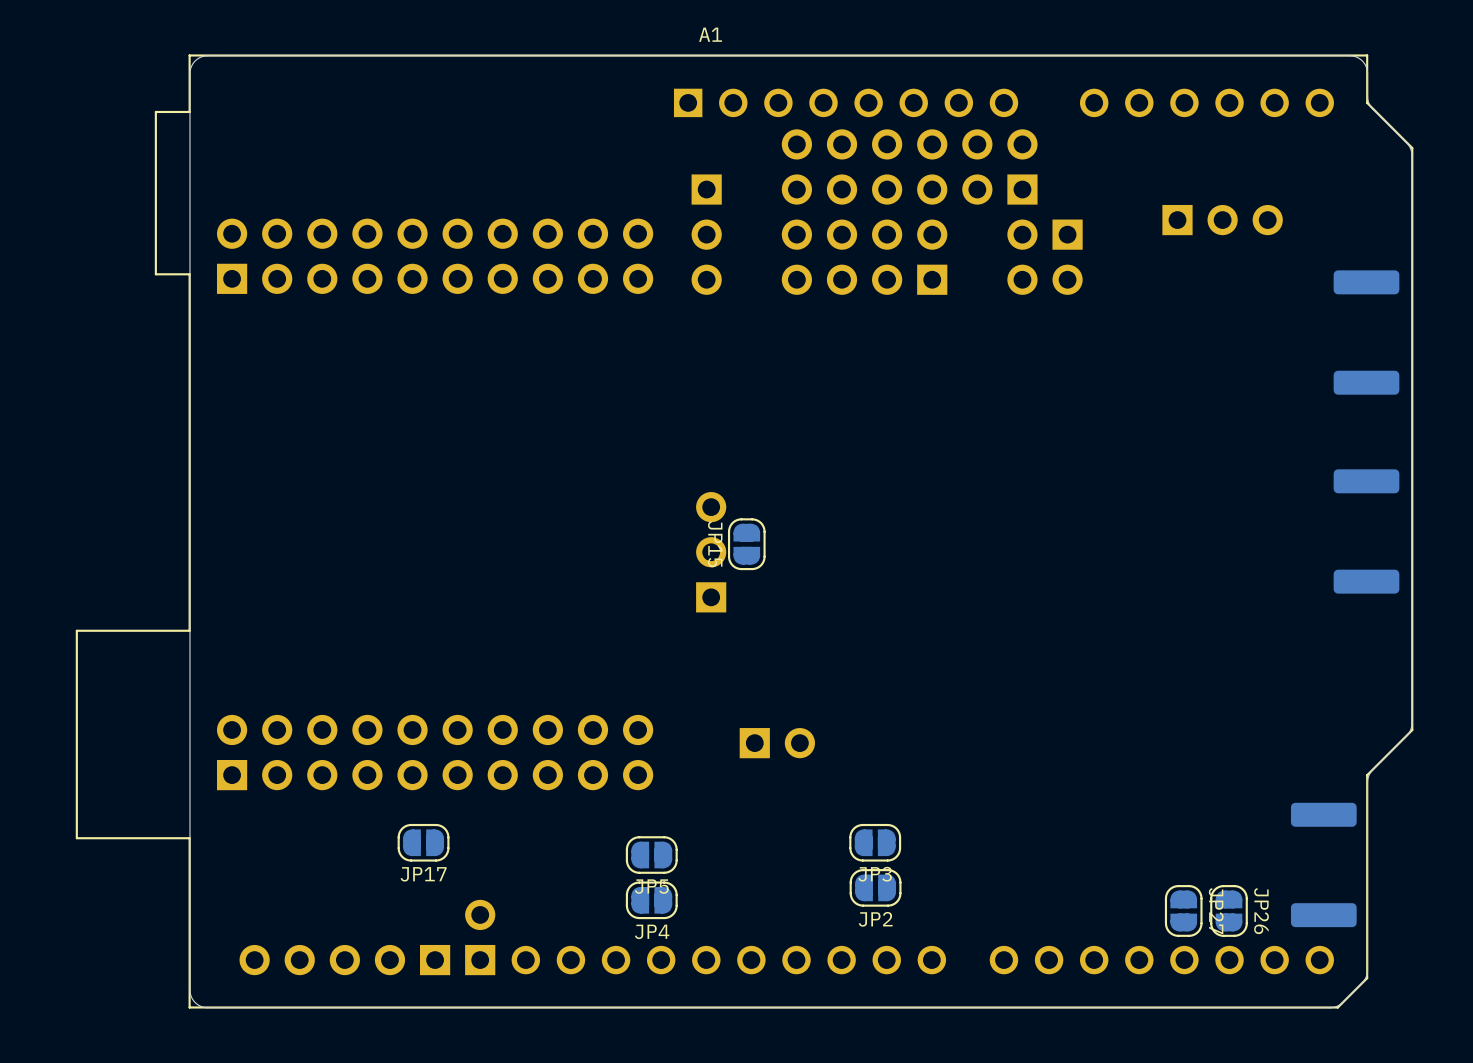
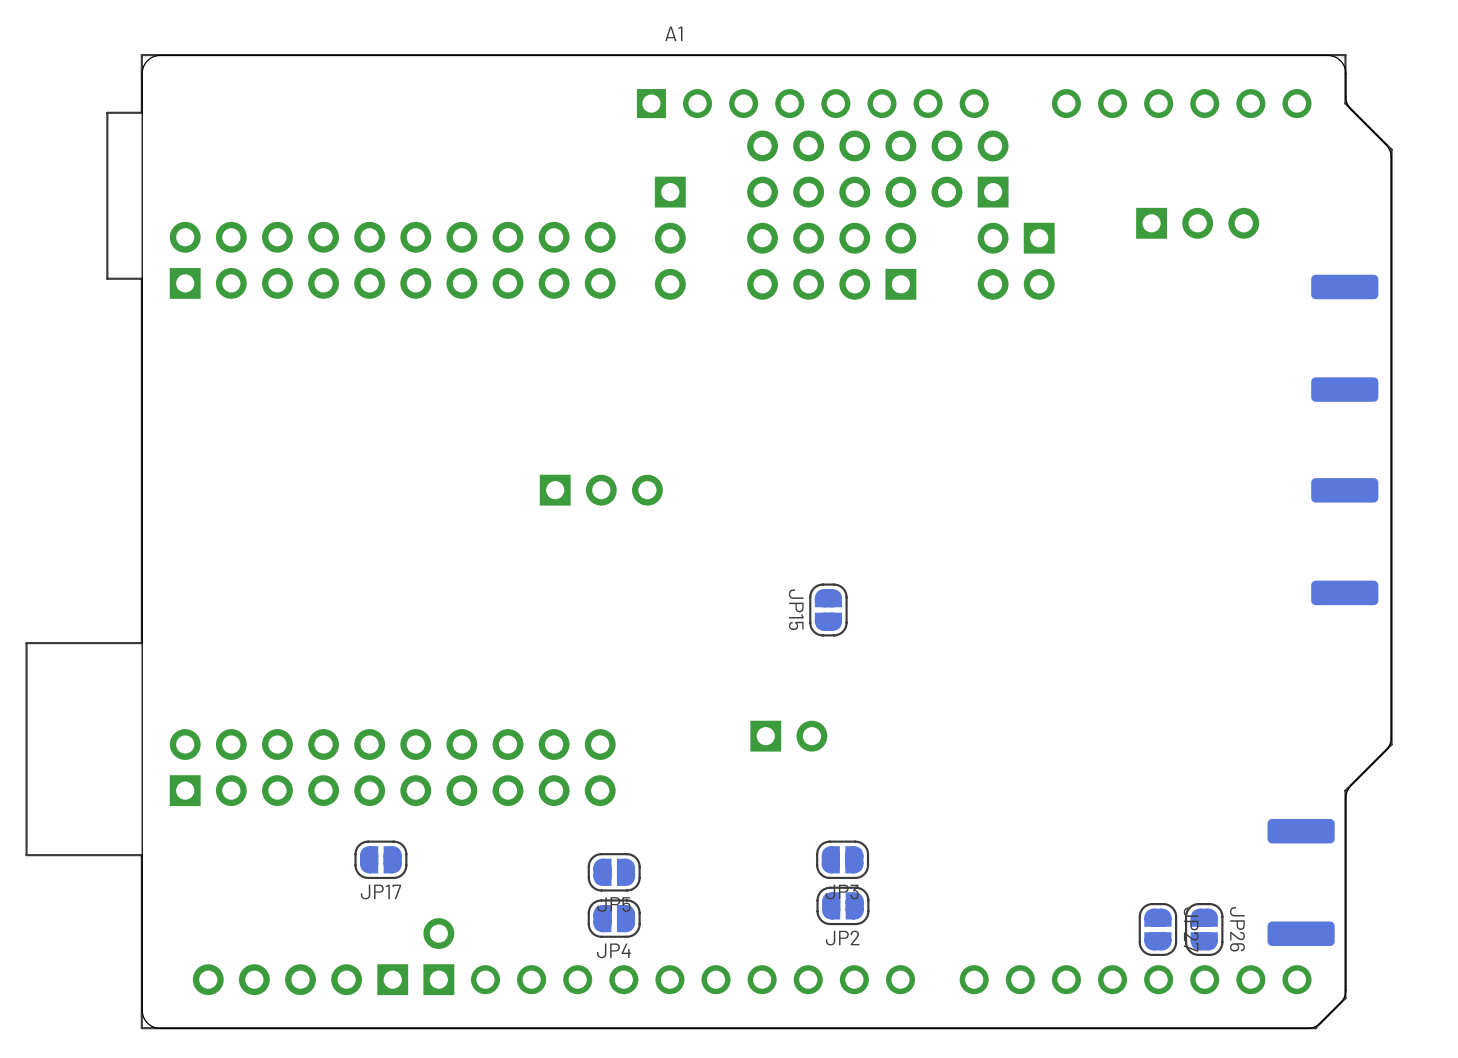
JP15 position: (746, 544) -> (828, 609)
part rotation: 0° (711, 552) -> 90° clockwise (601, 490)
part position: (711, 552) -> (601, 490)
part position: (777, 743) -> (788, 736)

